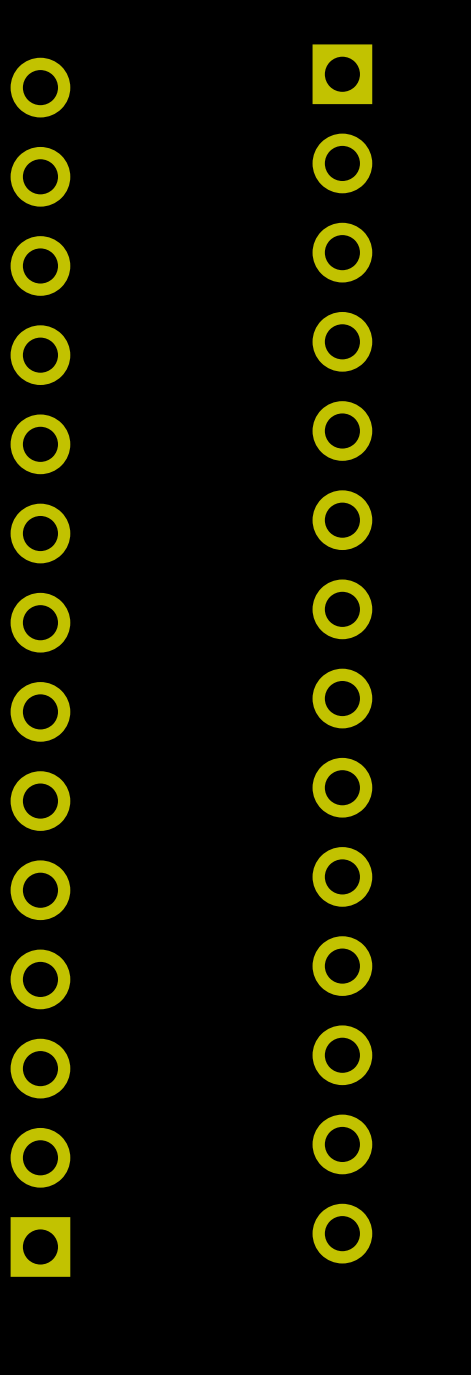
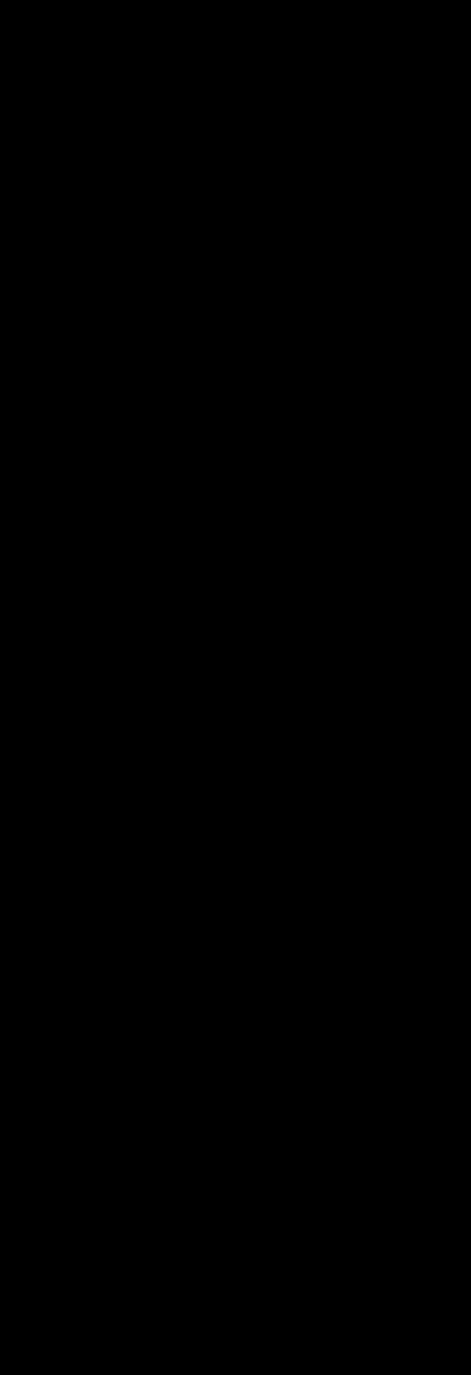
part: (342, 653) -> none
part: (40, 667) -> none

